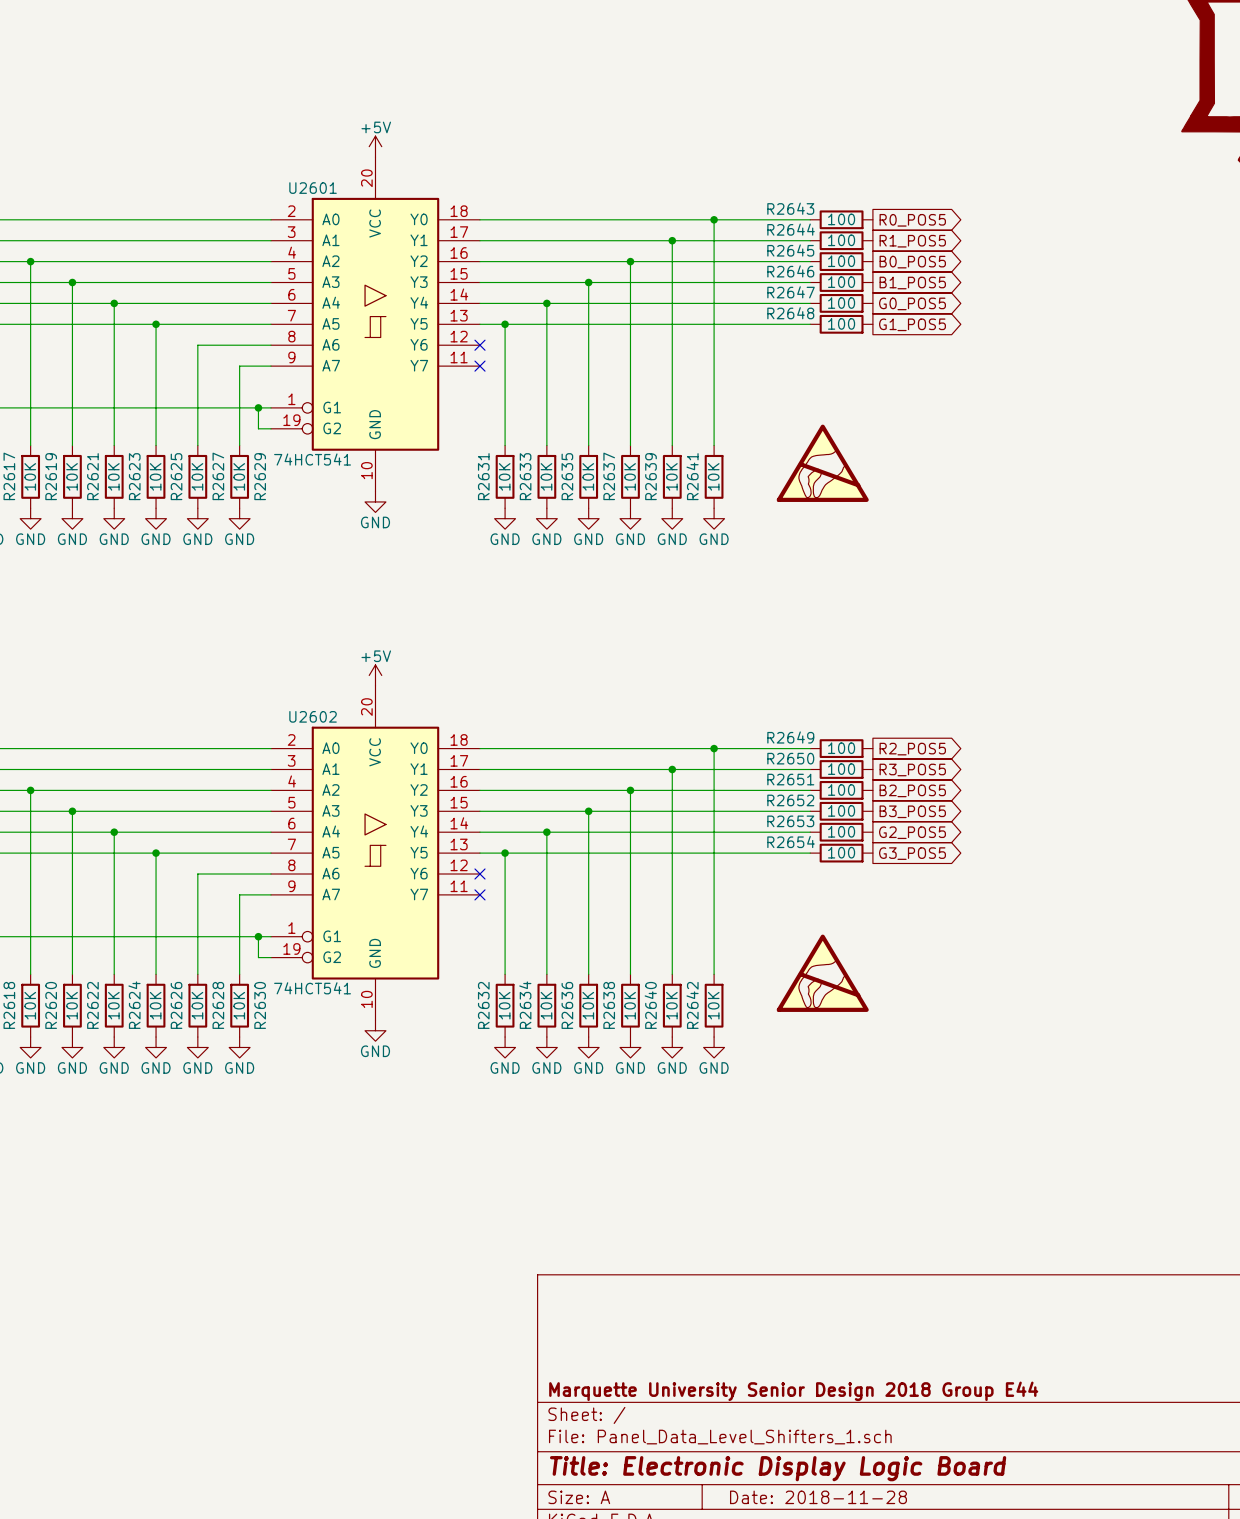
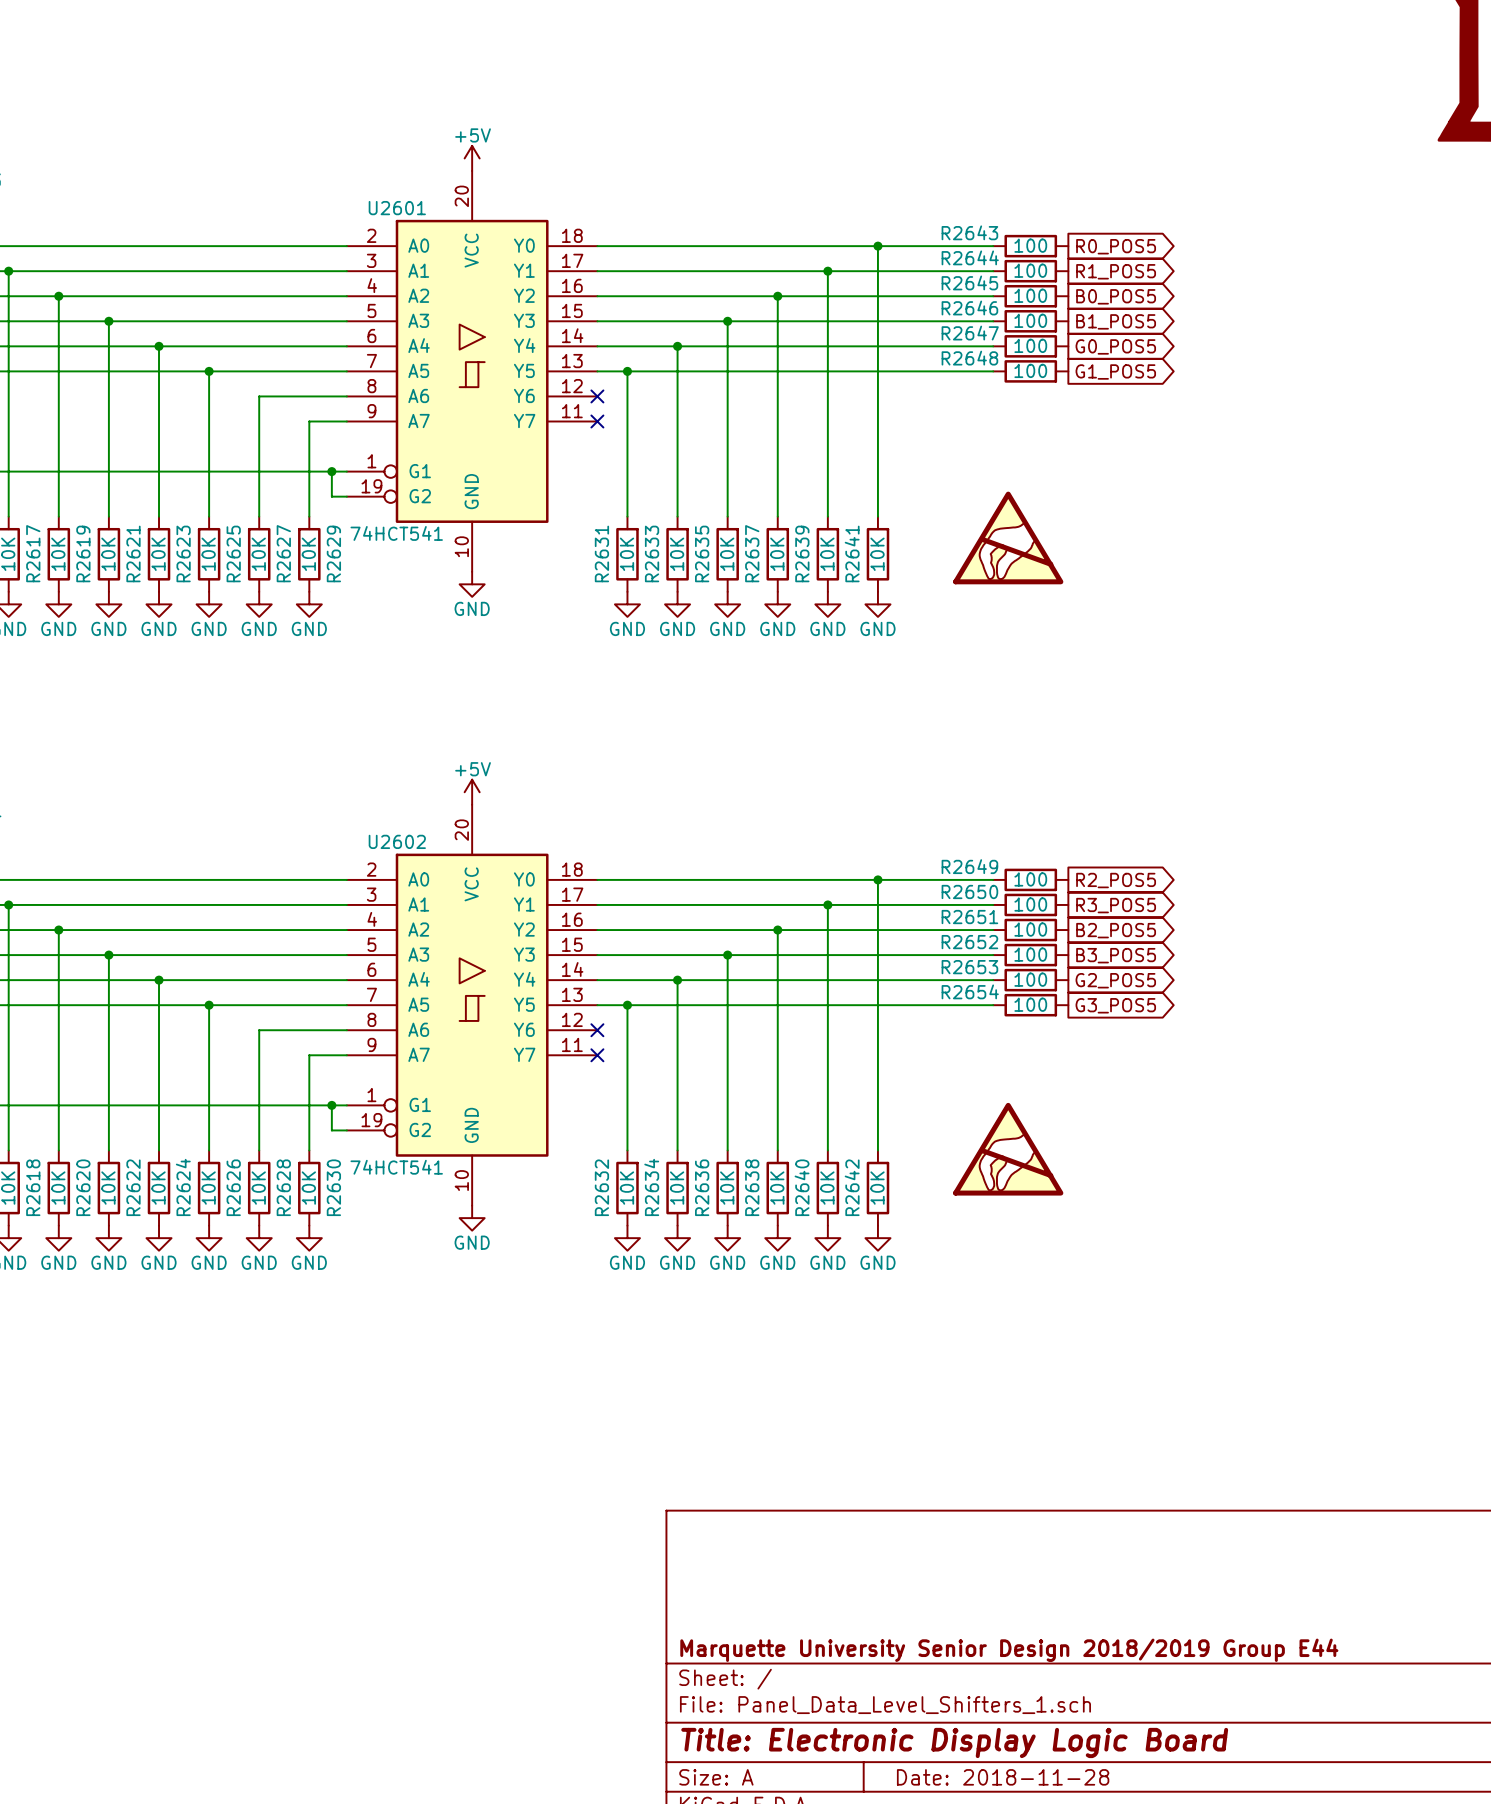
title block: Marquette University Senior Design 2018 Group E44 (793, 1391) -> Marquette University Senior Design 2018/2019 Group E44 (1009, 1650)

